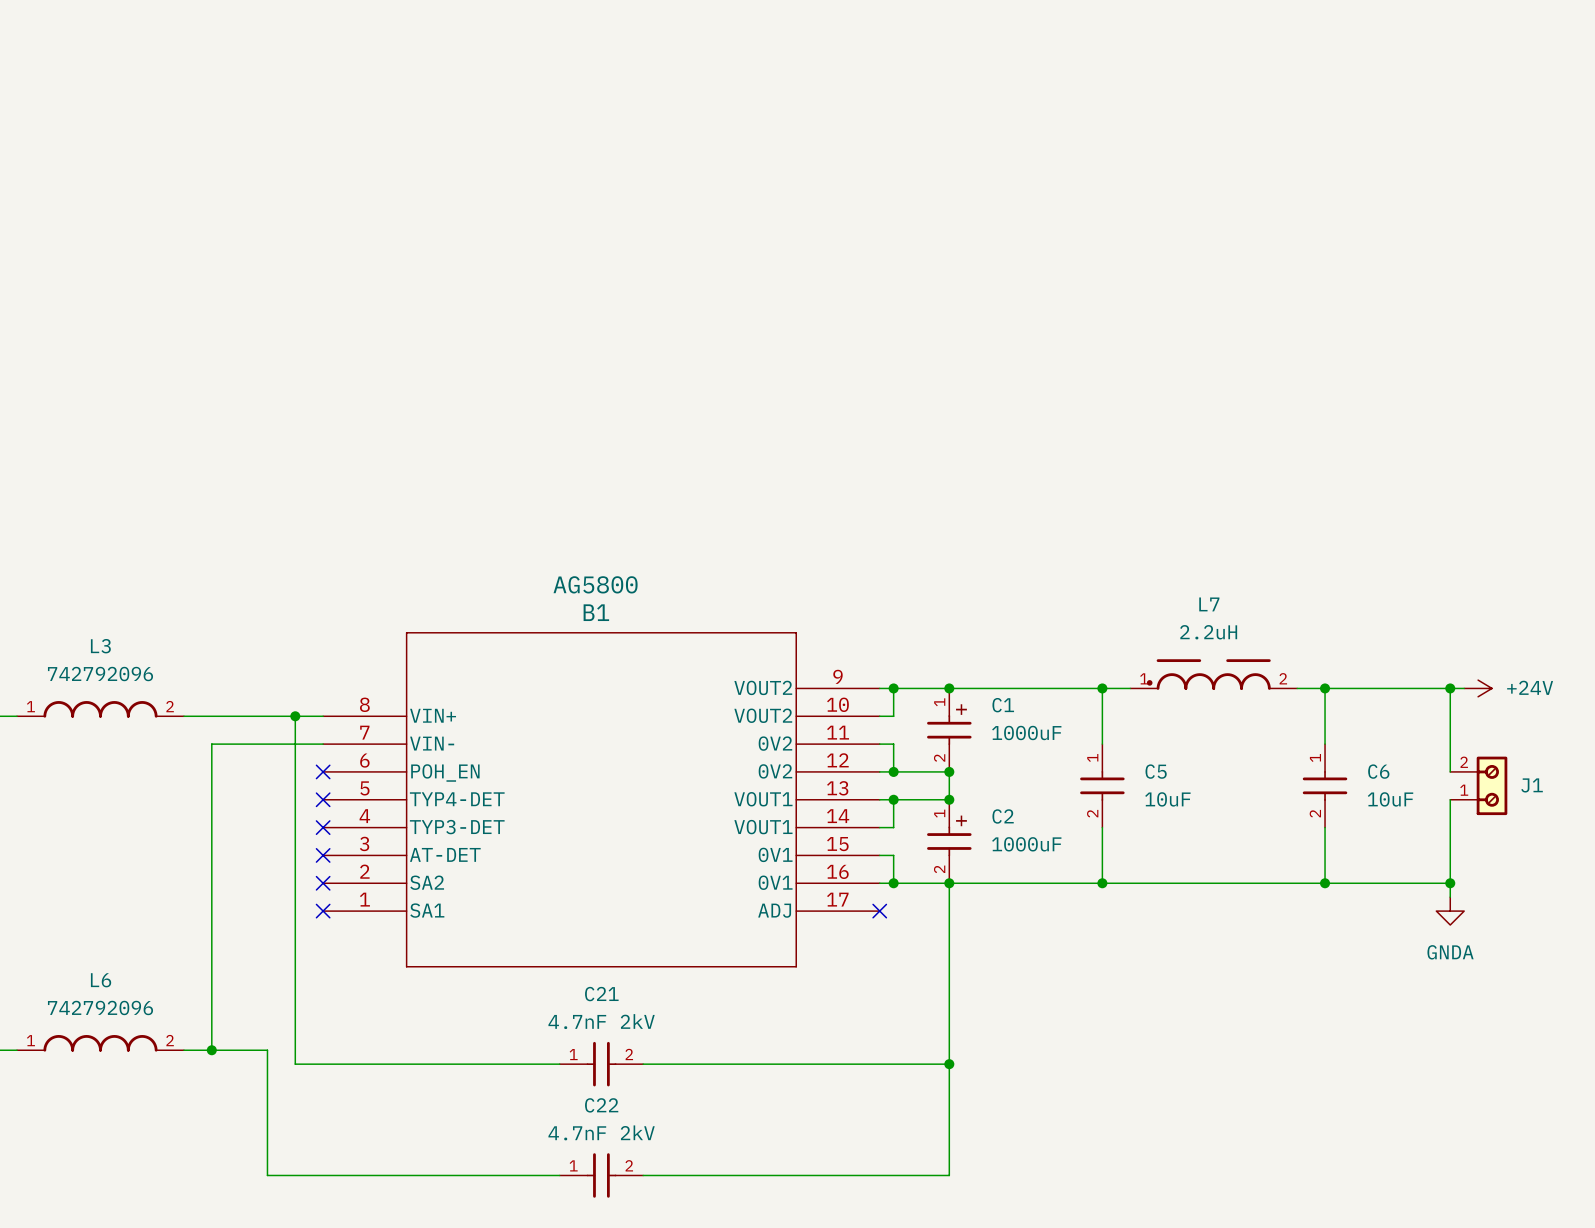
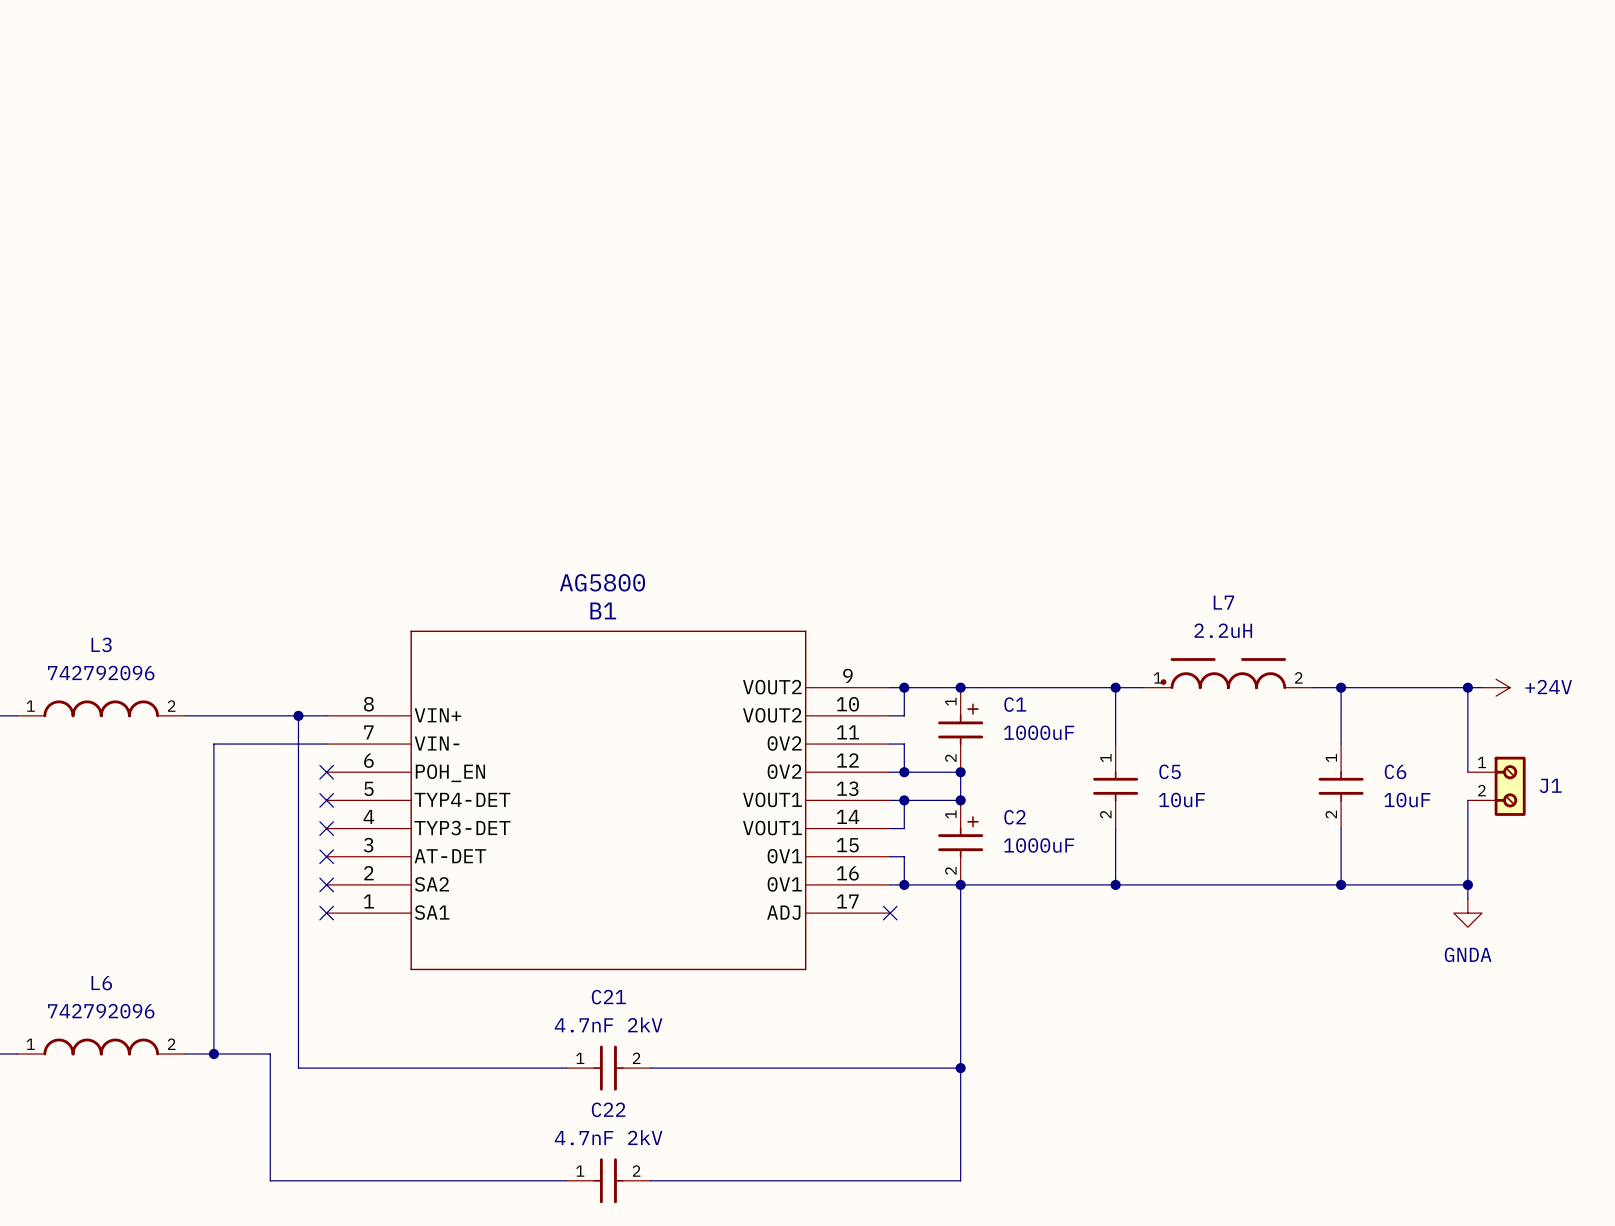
J1 flip: as is (1492, 785) -> up-down (1510, 786)

